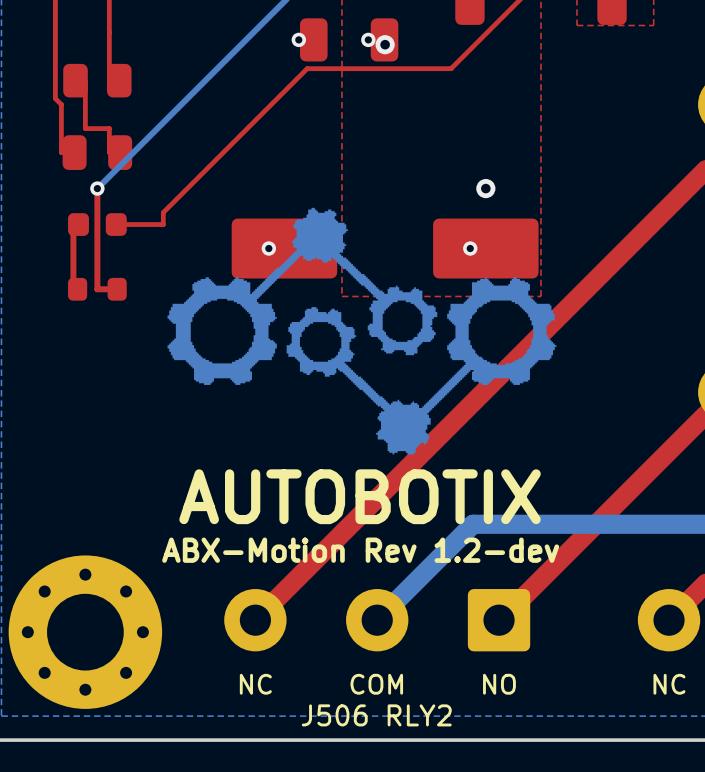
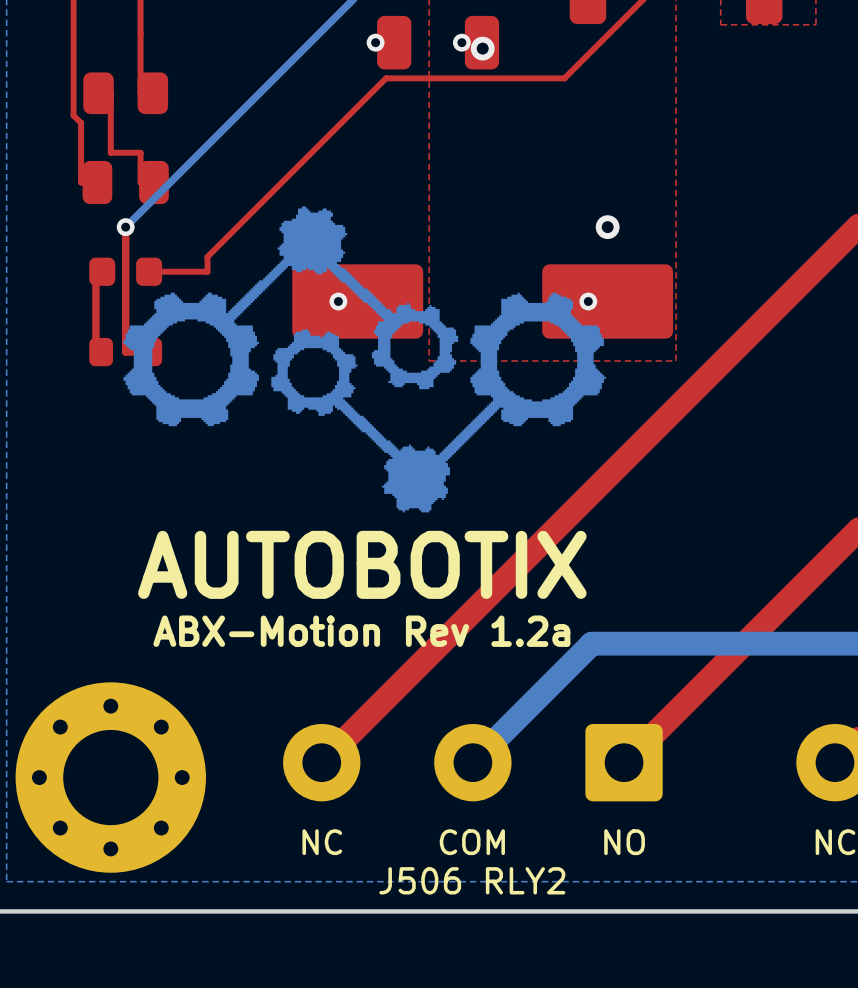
drawing: none -> [123, 206, 606, 513]
drawing: [167, 207, 557, 455] -> none

